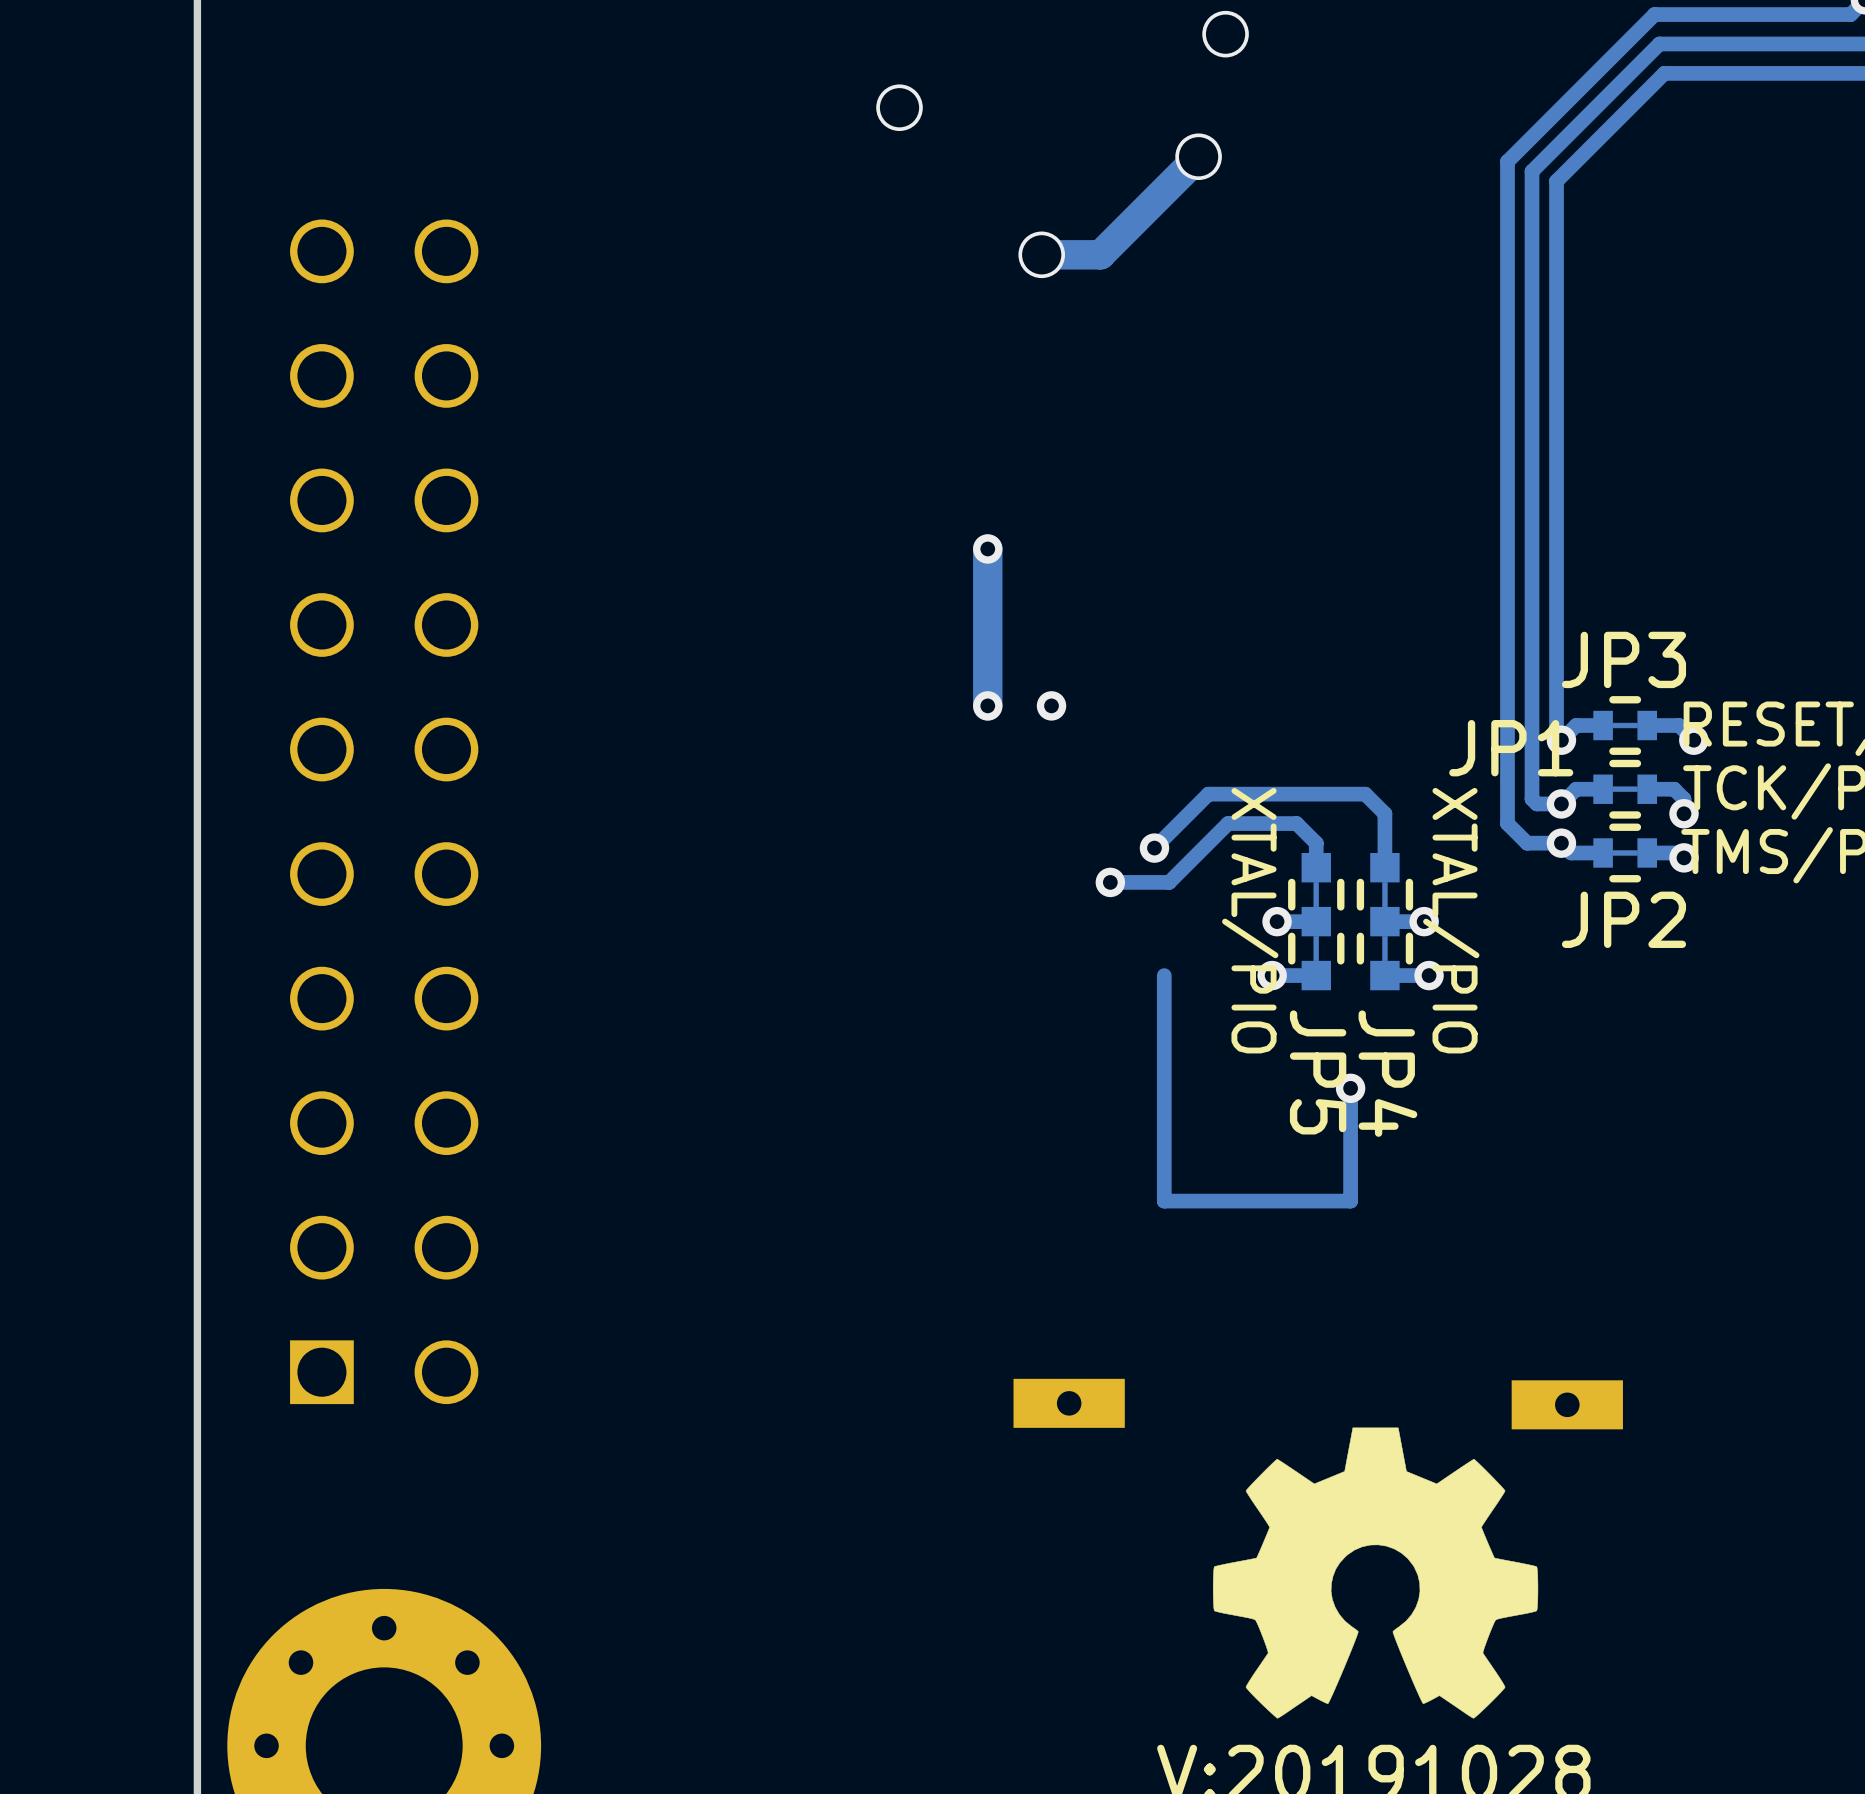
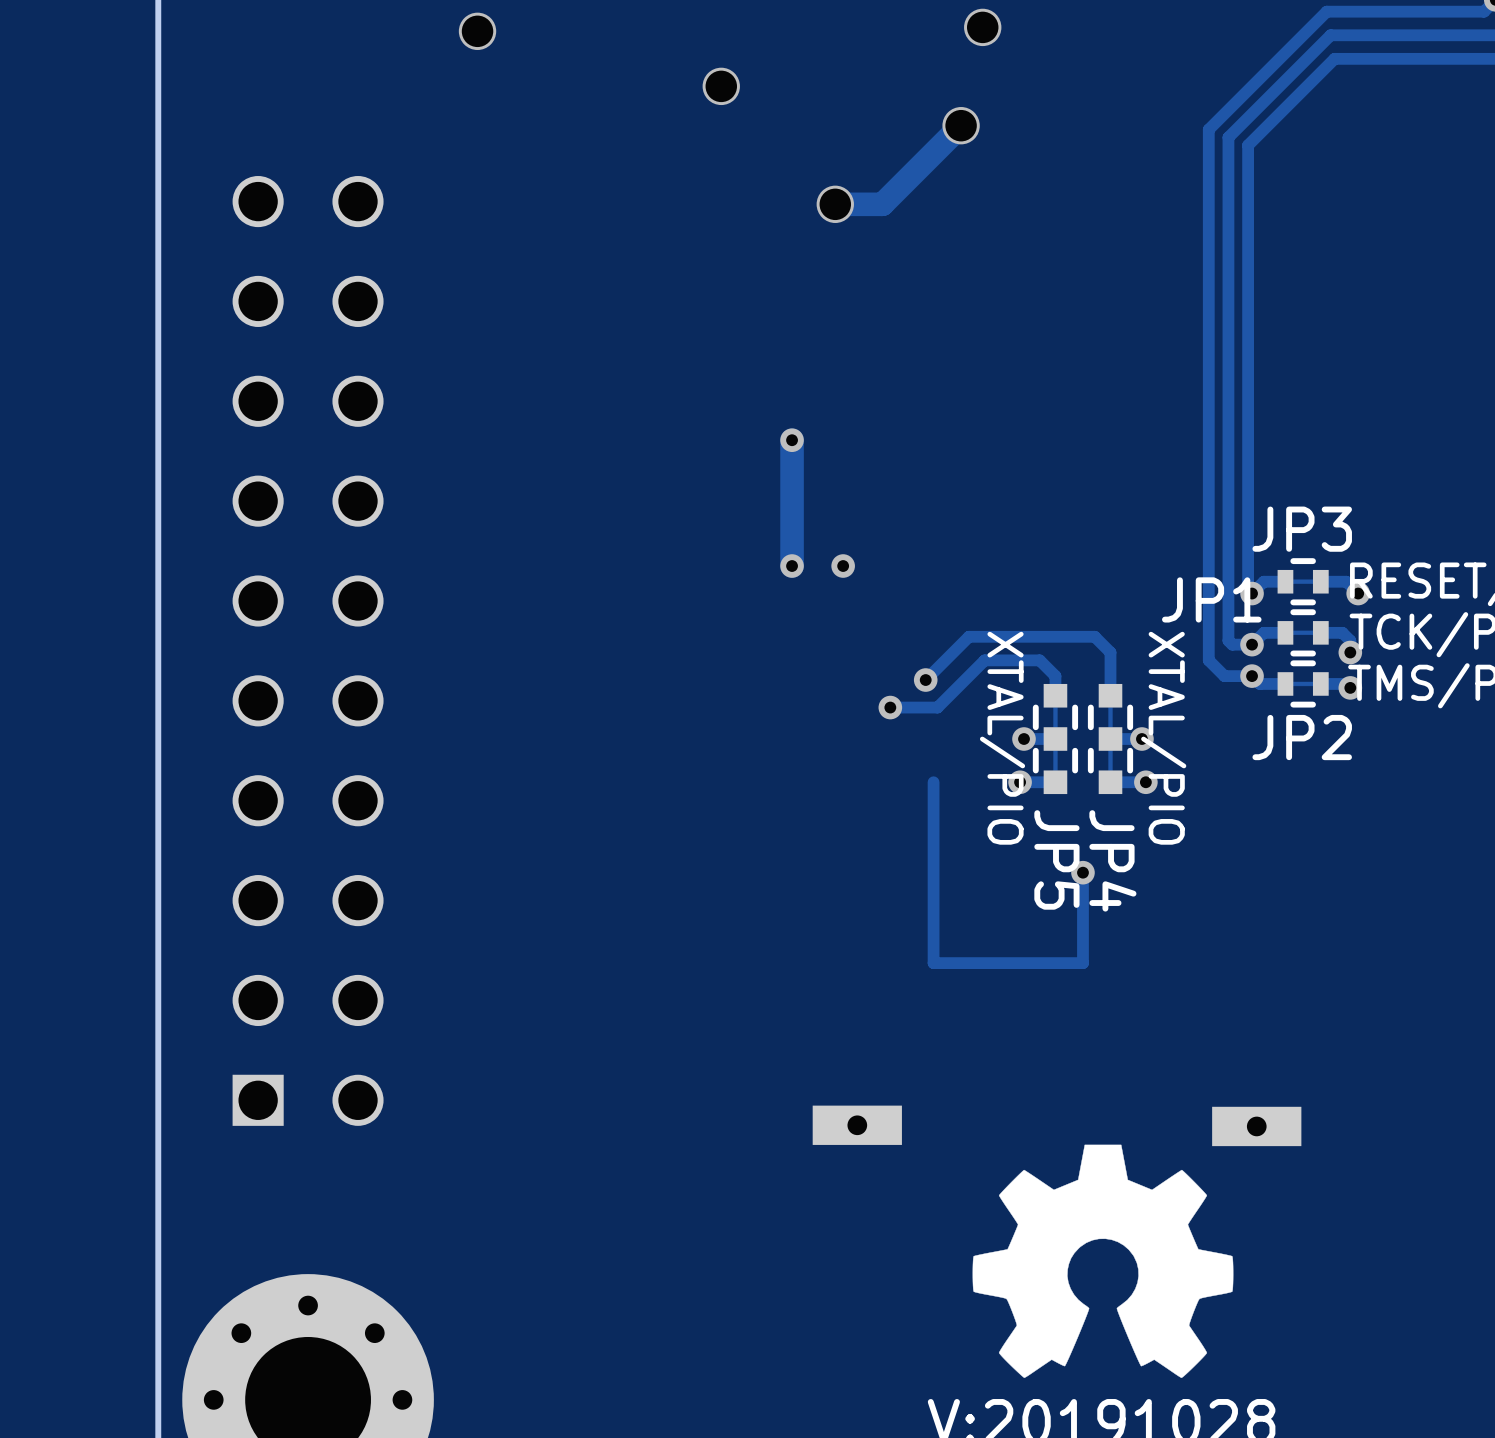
via: none -> (477, 31)

